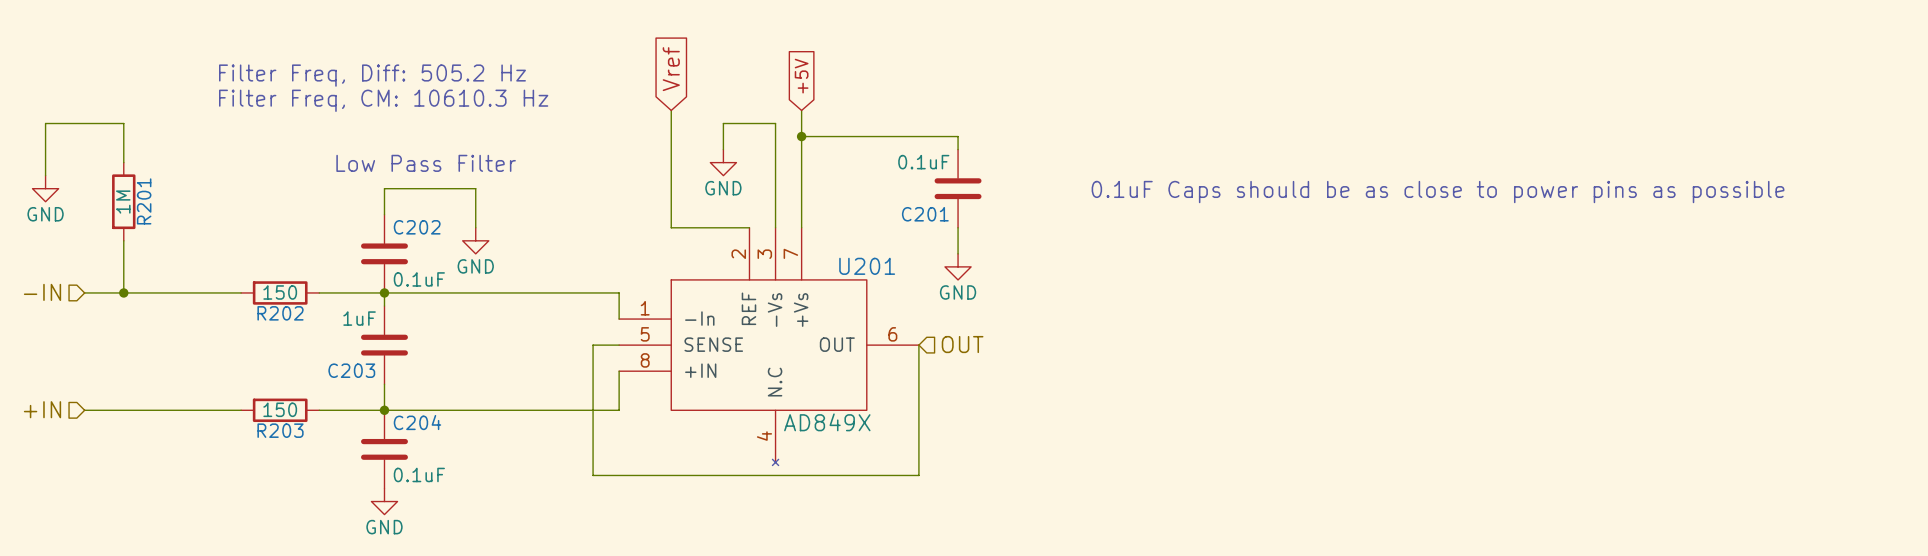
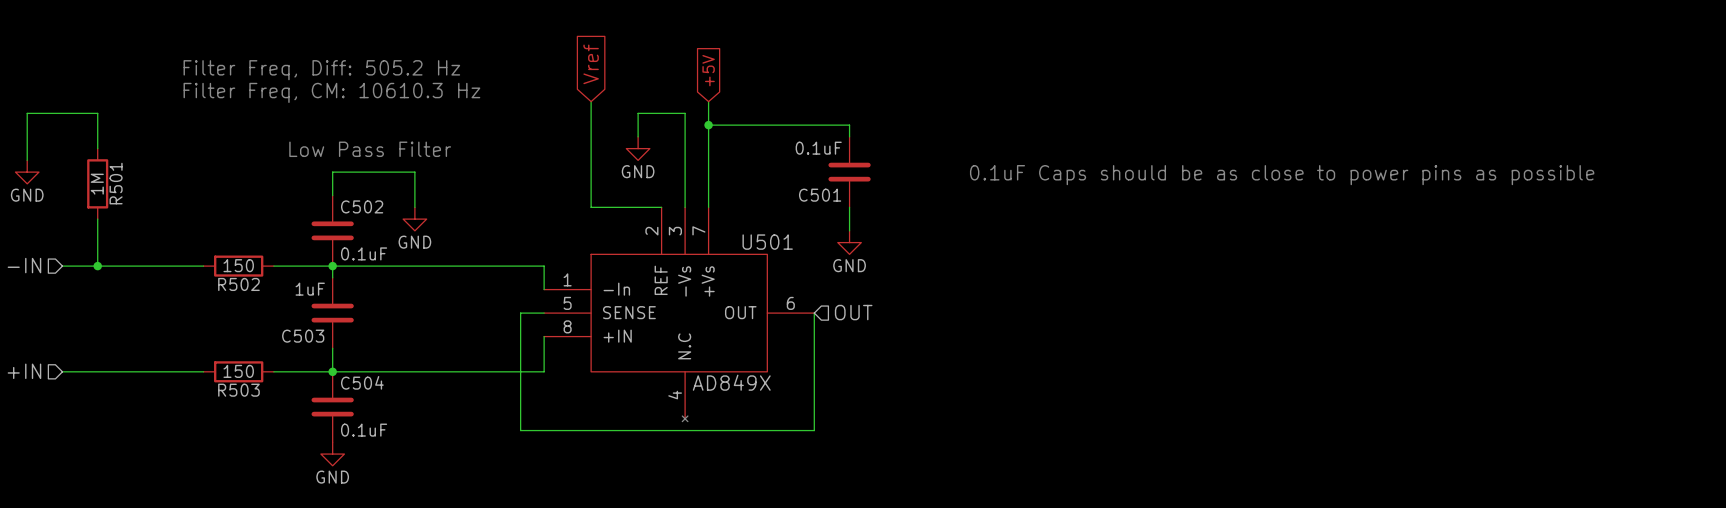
R201 name: R201 (144, 201) -> R501 (116, 183)
C201 name: C201 (925, 214) -> C501 (820, 195)
C202 name: C202 (417, 227) -> C502 (362, 206)
U201 name: U201 (867, 266) -> U501 (767, 242)
R202 name: R202 (280, 313) -> R502 (238, 284)
C203 name: C203 (351, 370) -> C503 (303, 336)
C204 name: C204 (417, 422) -> C504 (362, 382)
R203 name: R203 (280, 430) -> R503 (238, 390)

